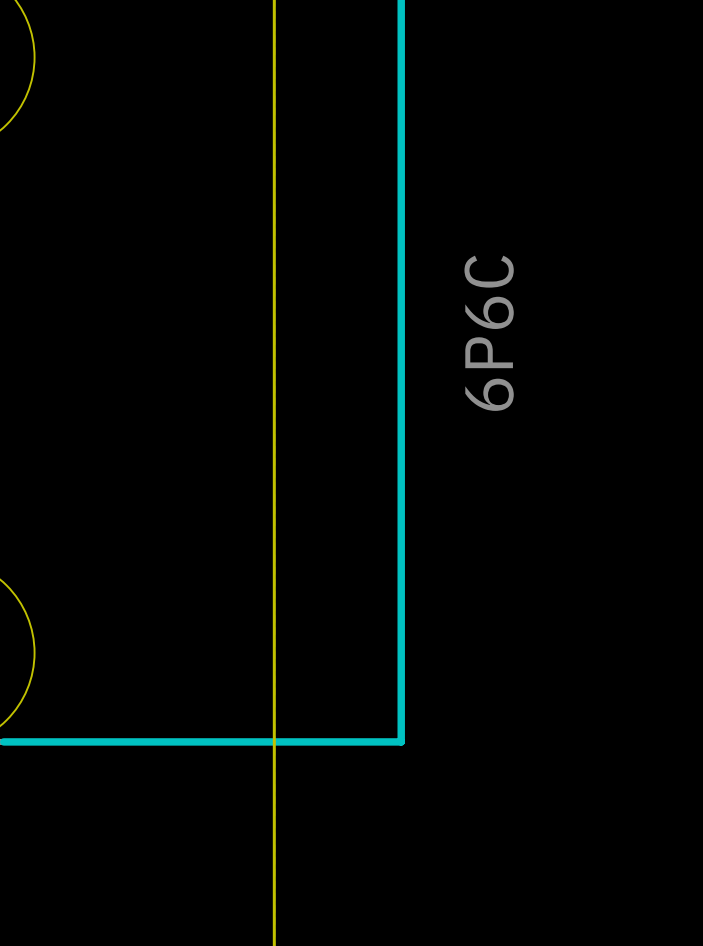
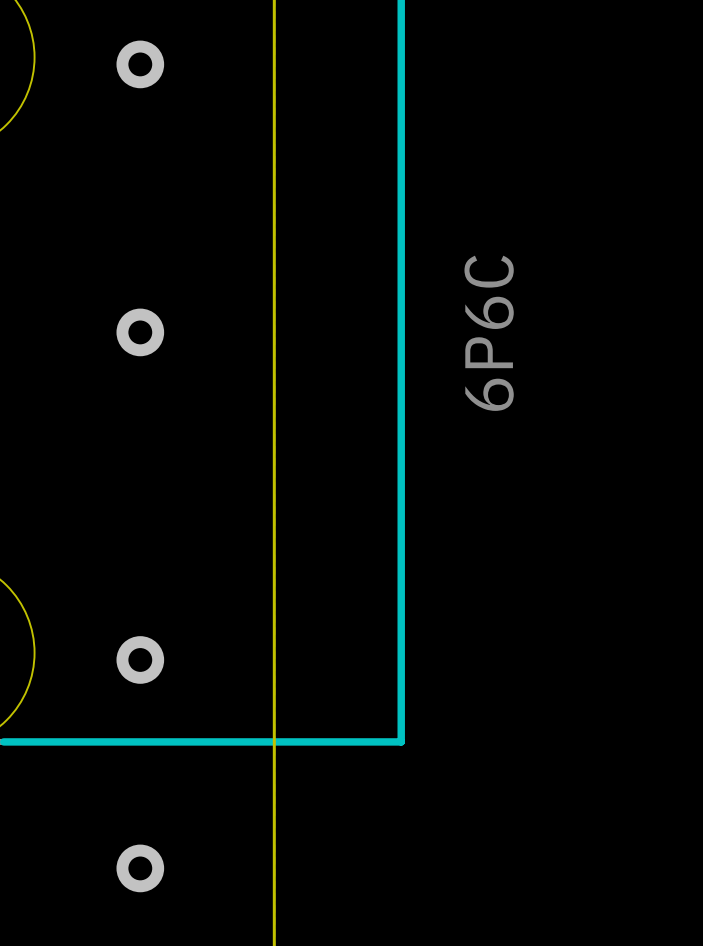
via: none -> (140, 64)
via: none -> (140, 332)
via: none -> (140, 659)
via: none -> (140, 868)

